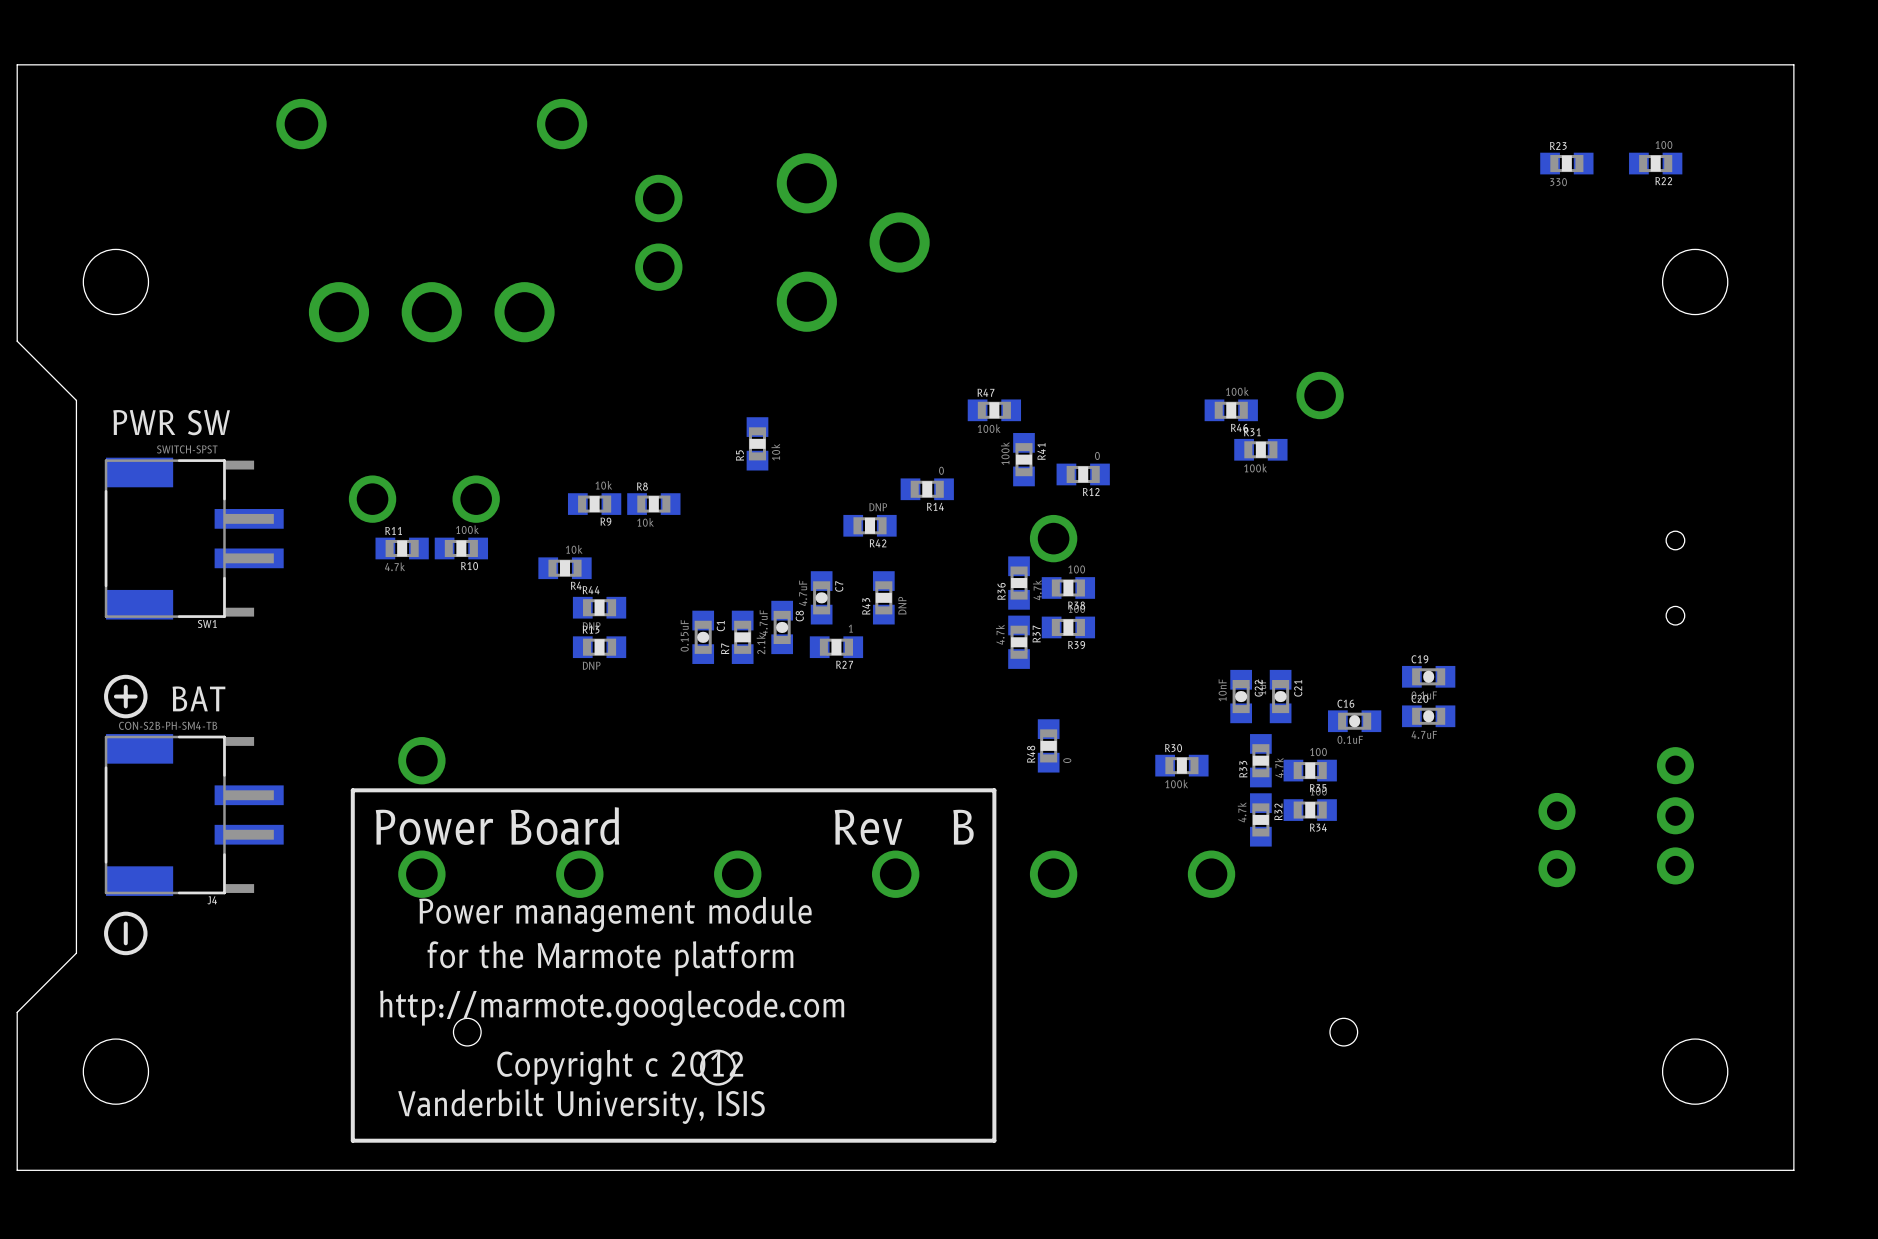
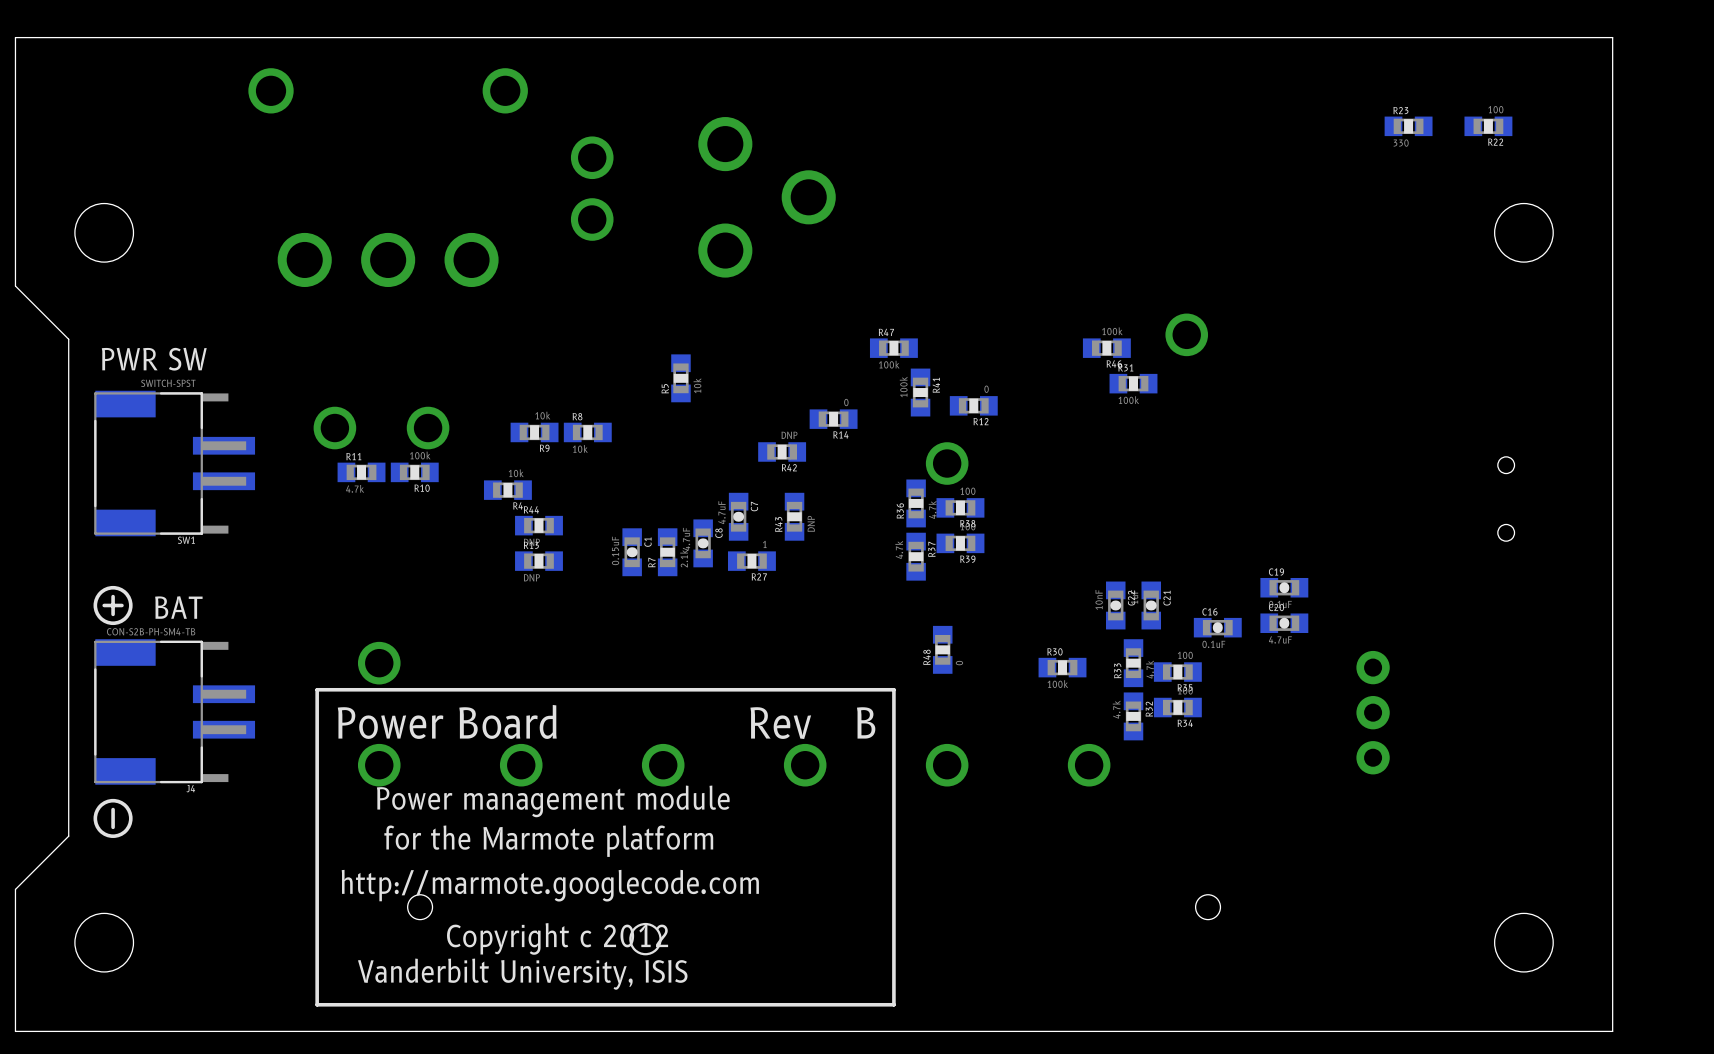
part position: (1675, 815) -> (1373, 712)
part: (1556, 840) -> none

